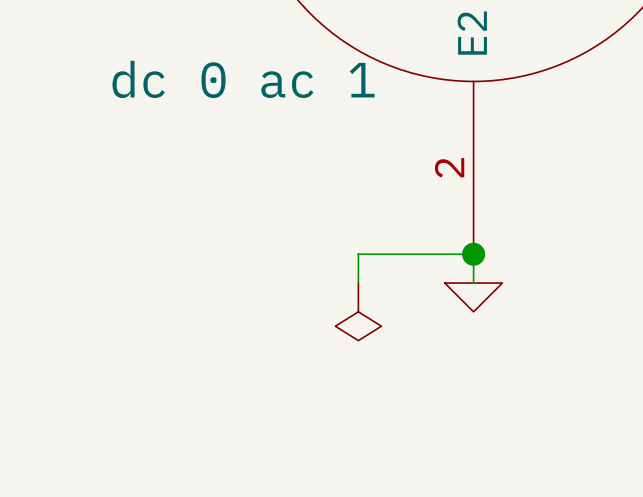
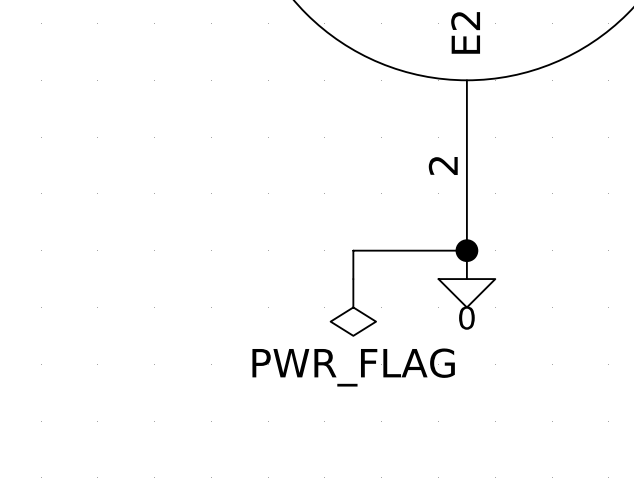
part text: dc 0 ac 1 (243, 79) -> none
power symbol text: none -> 0 (466, 317)
power symbol text: none -> PWR_FLAG (353, 367)

